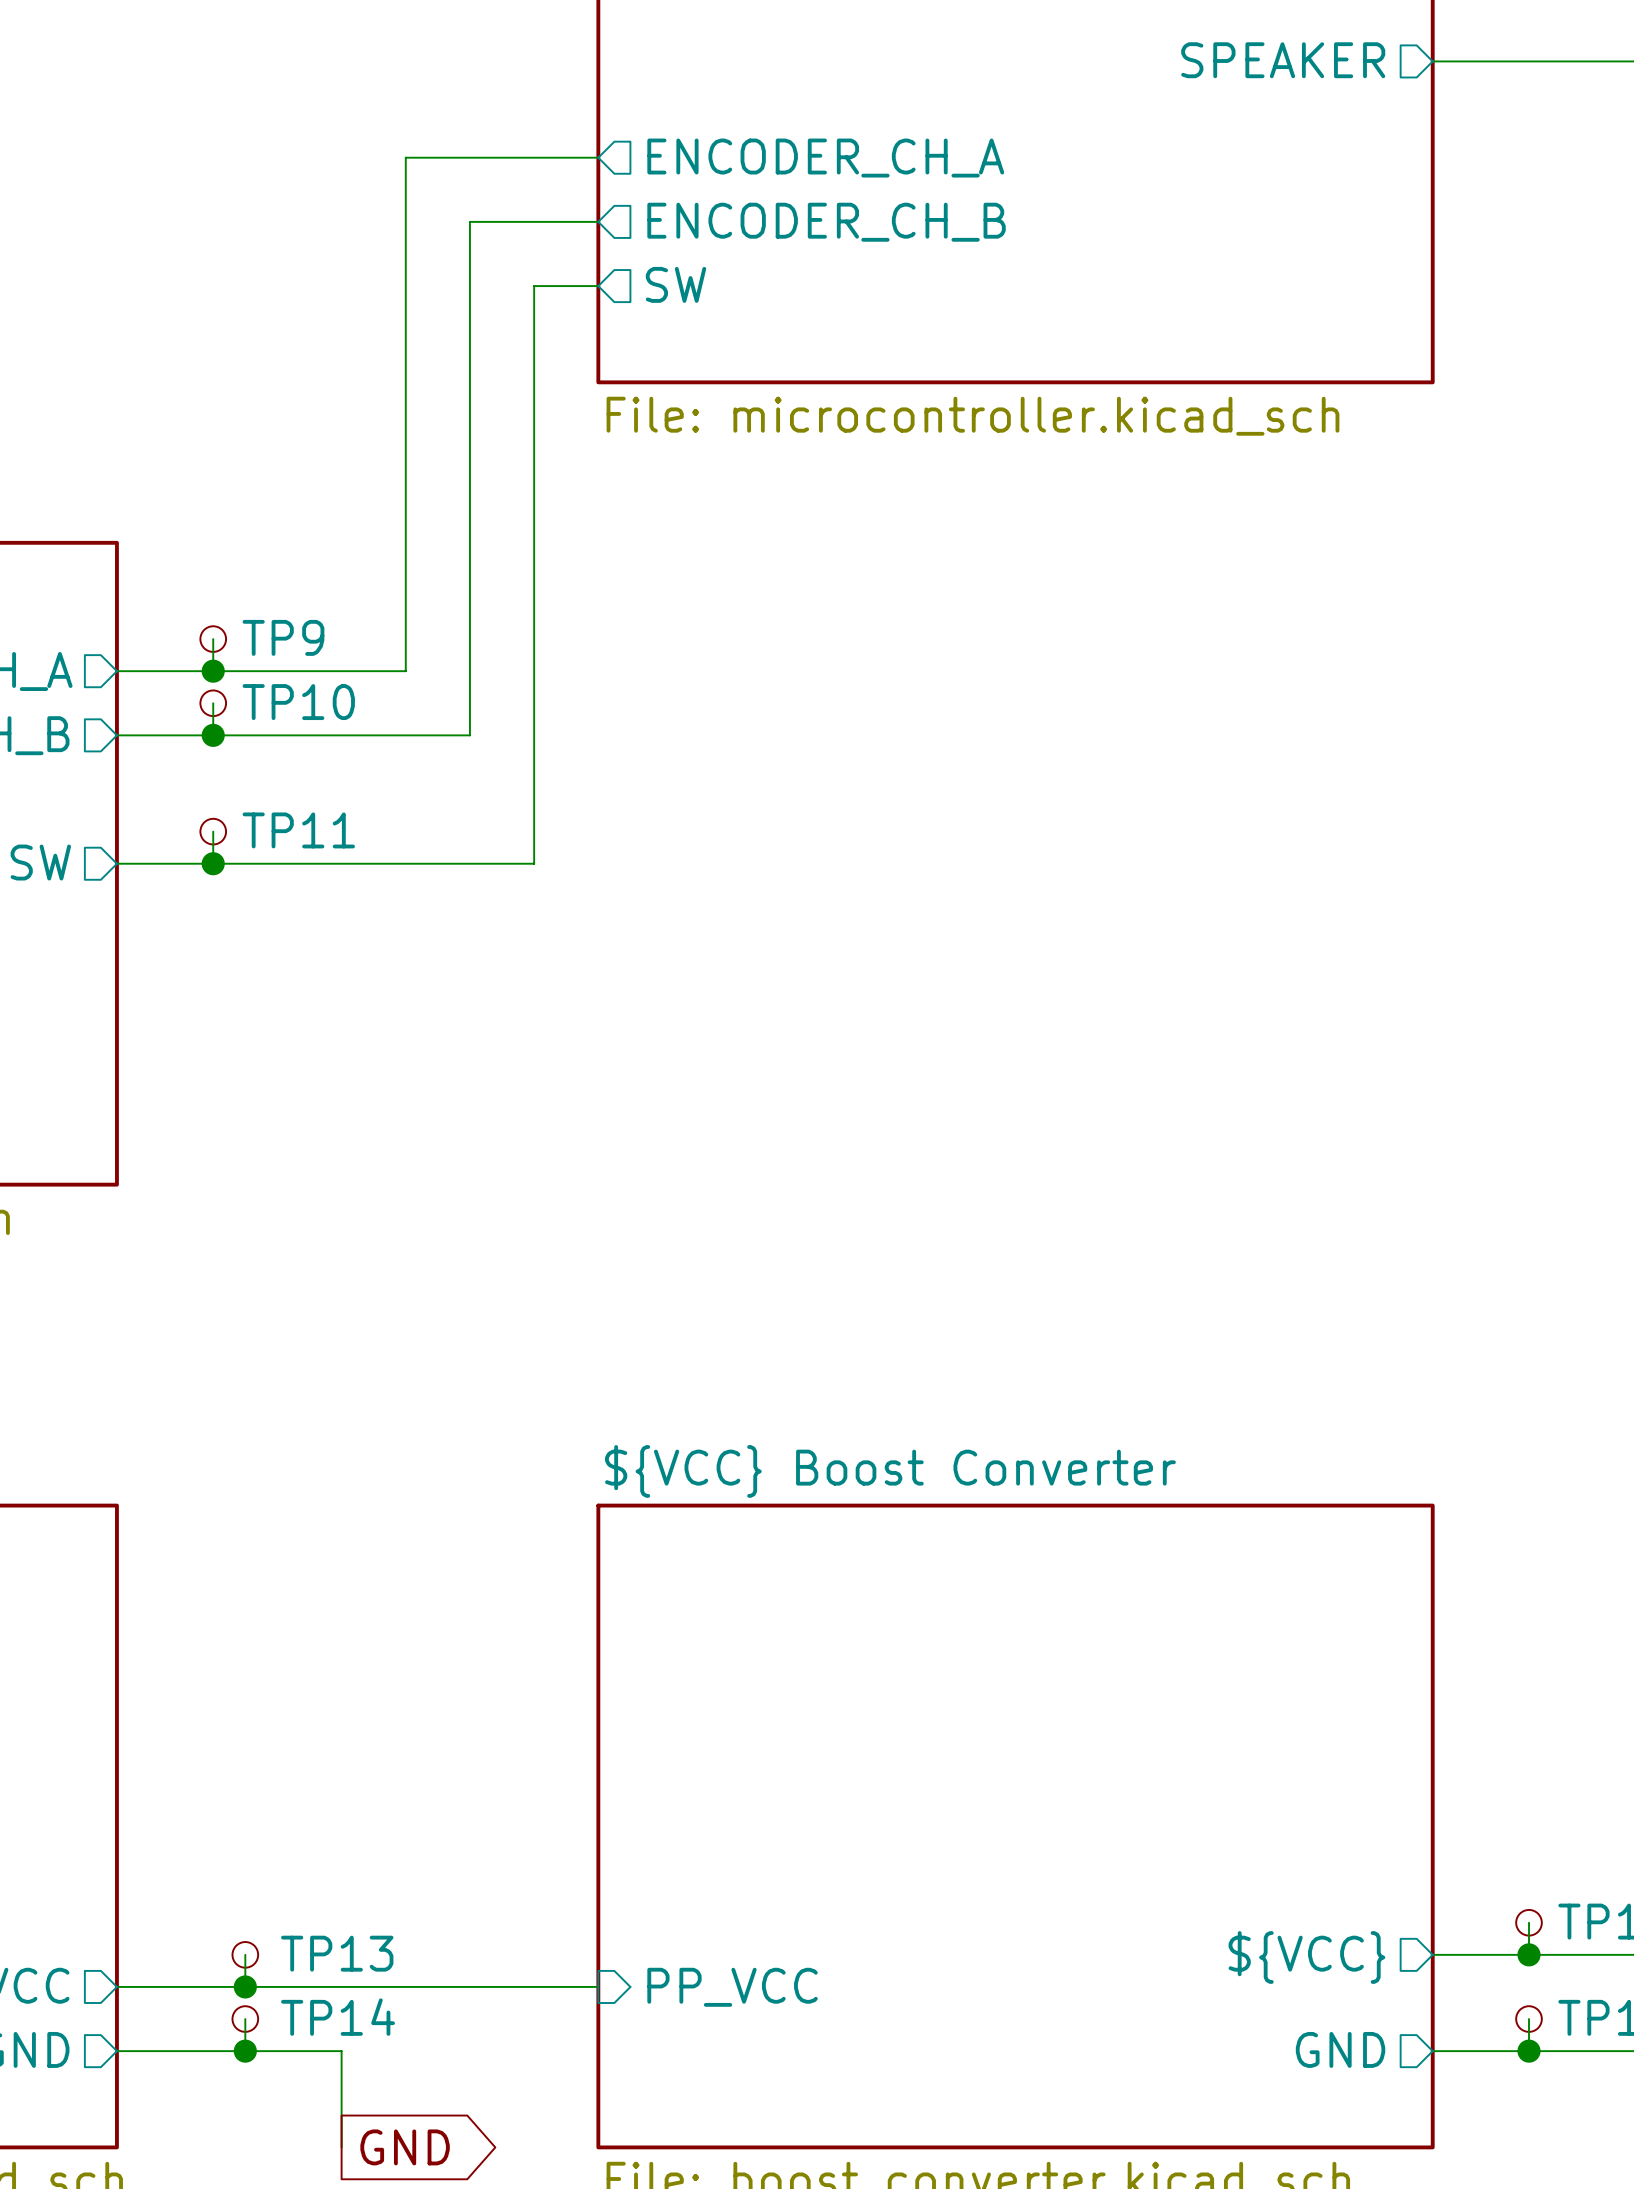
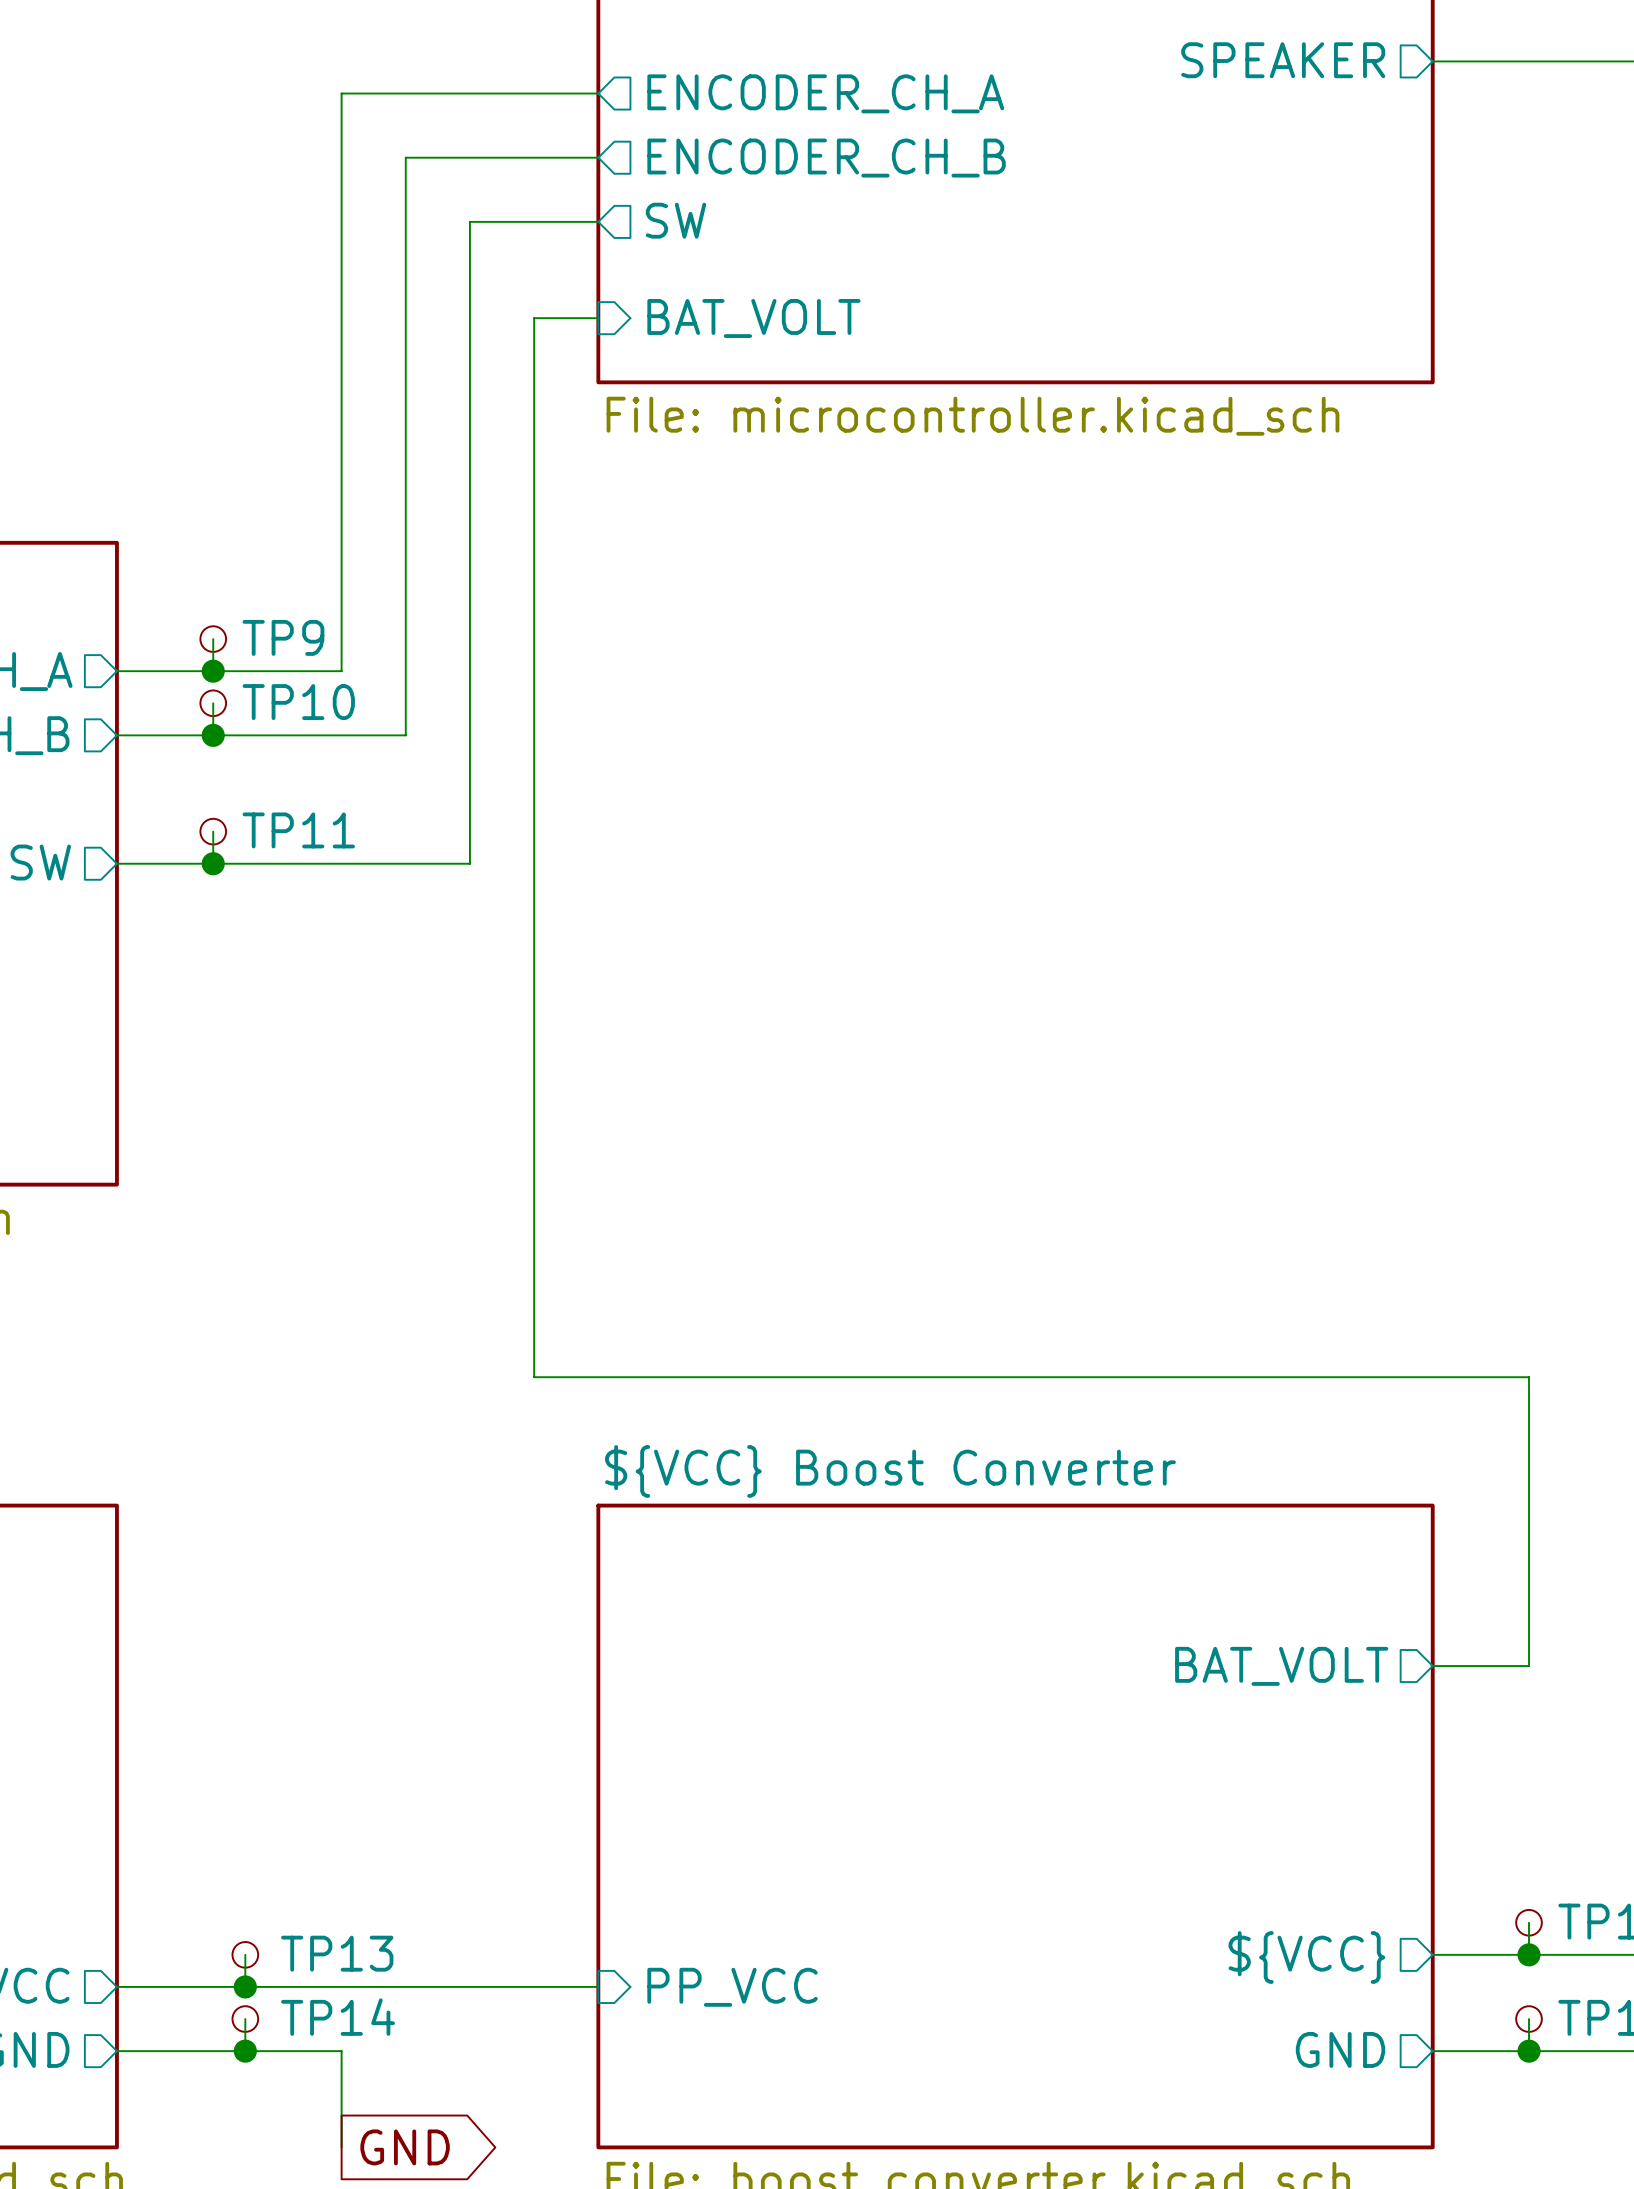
wire: none -> (598, 93) (341, 93) (341, 671)
sheet pin: none -> ENCODER_CH_A (825, 93)
sheet pin: ENCODER_CH_A (825, 158) -> ENCODER_CH_B (826, 158)
sheet pin: ENCODER_CH_B (826, 222) -> SW (676, 220)
sheet pin: SW (676, 284) -> none
wire: (598, 286) (534, 286) (534, 318) -> (598, 318) (534, 318)
sheet pin: none -> BAT_VOLT (753, 318)
wire: (341, 671) (405, 671) -> (405, 735) (405, 671)
wire: (405, 735) (469, 735) -> (469, 863) (469, 735)
wire: (469, 863) (534, 863) -> (1432, 1666) (1529, 1666) (1529, 1377) (534, 1377) (534, 863)
sheet pin: none -> BAT_VOLT (1281, 1666)

